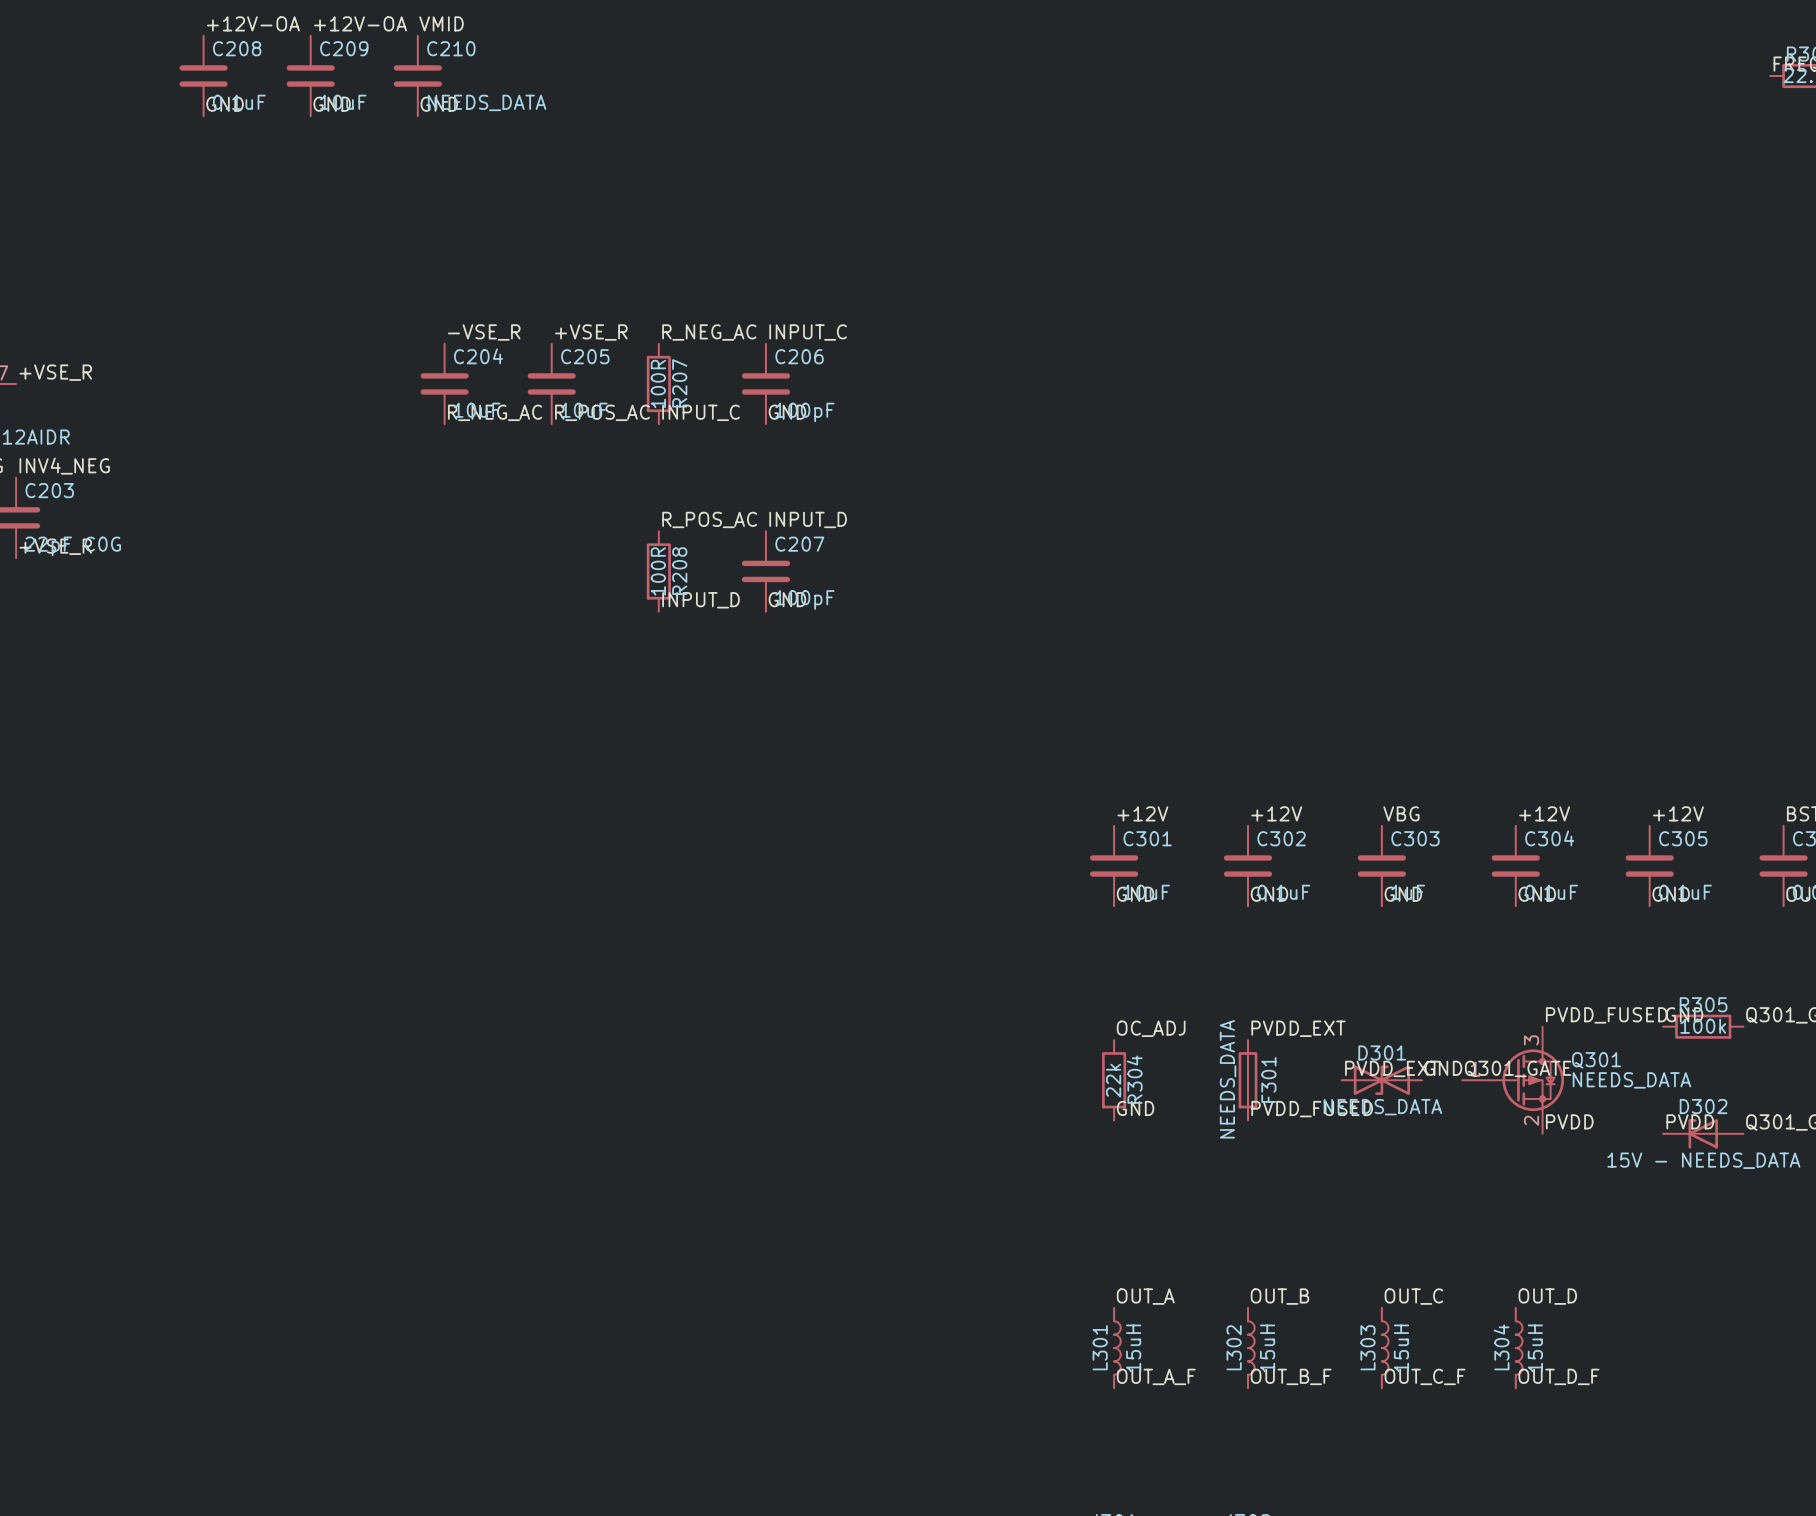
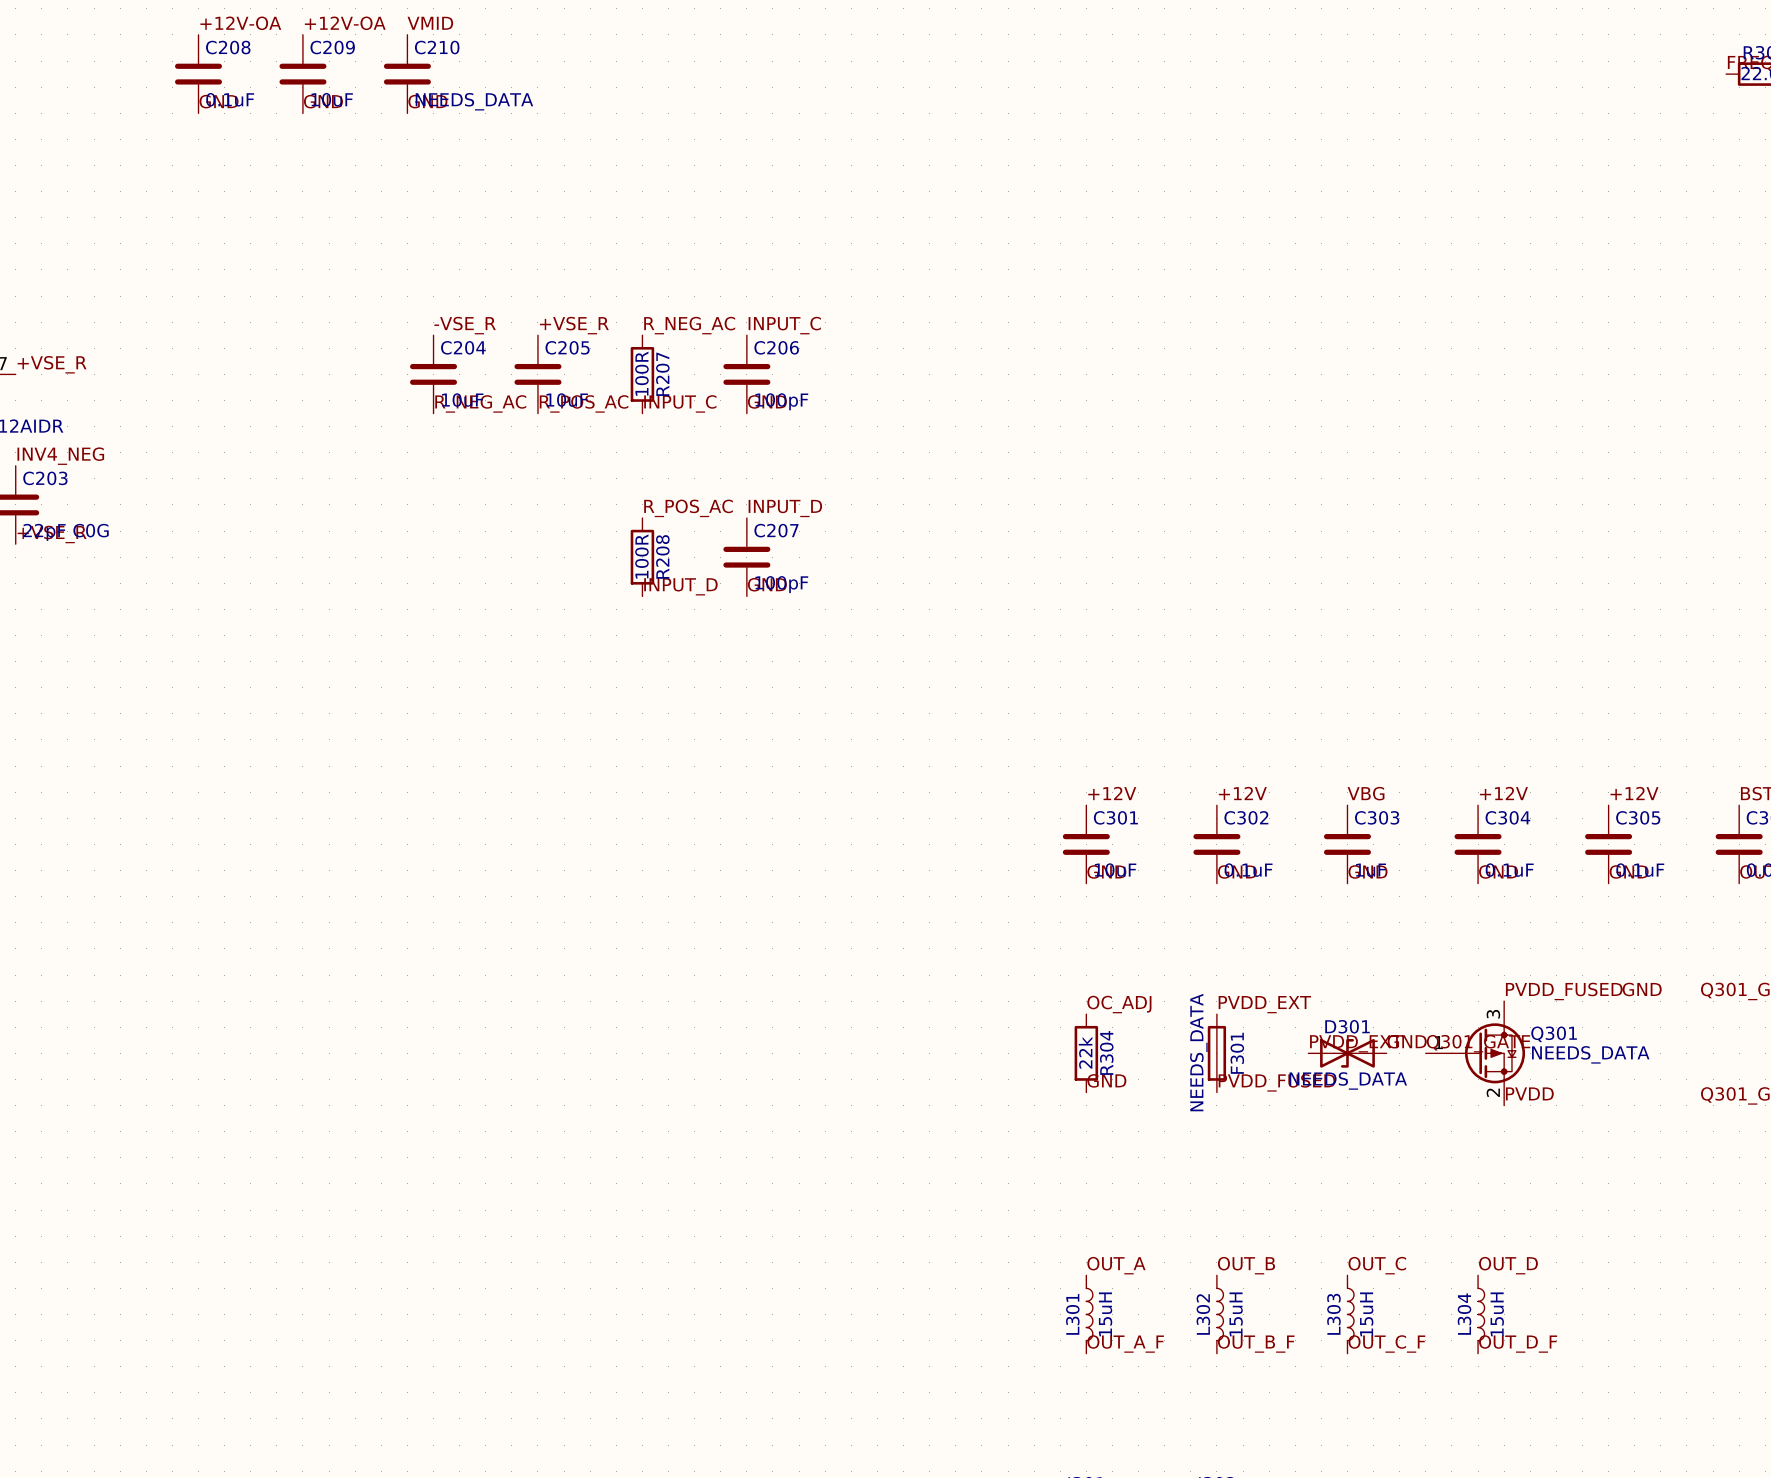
R305: 100k (1703, 1026) -> none
label: PVDD (1690, 1121) -> none
D302: 15V - NEEDS_DATA (1703, 1133) -> none

